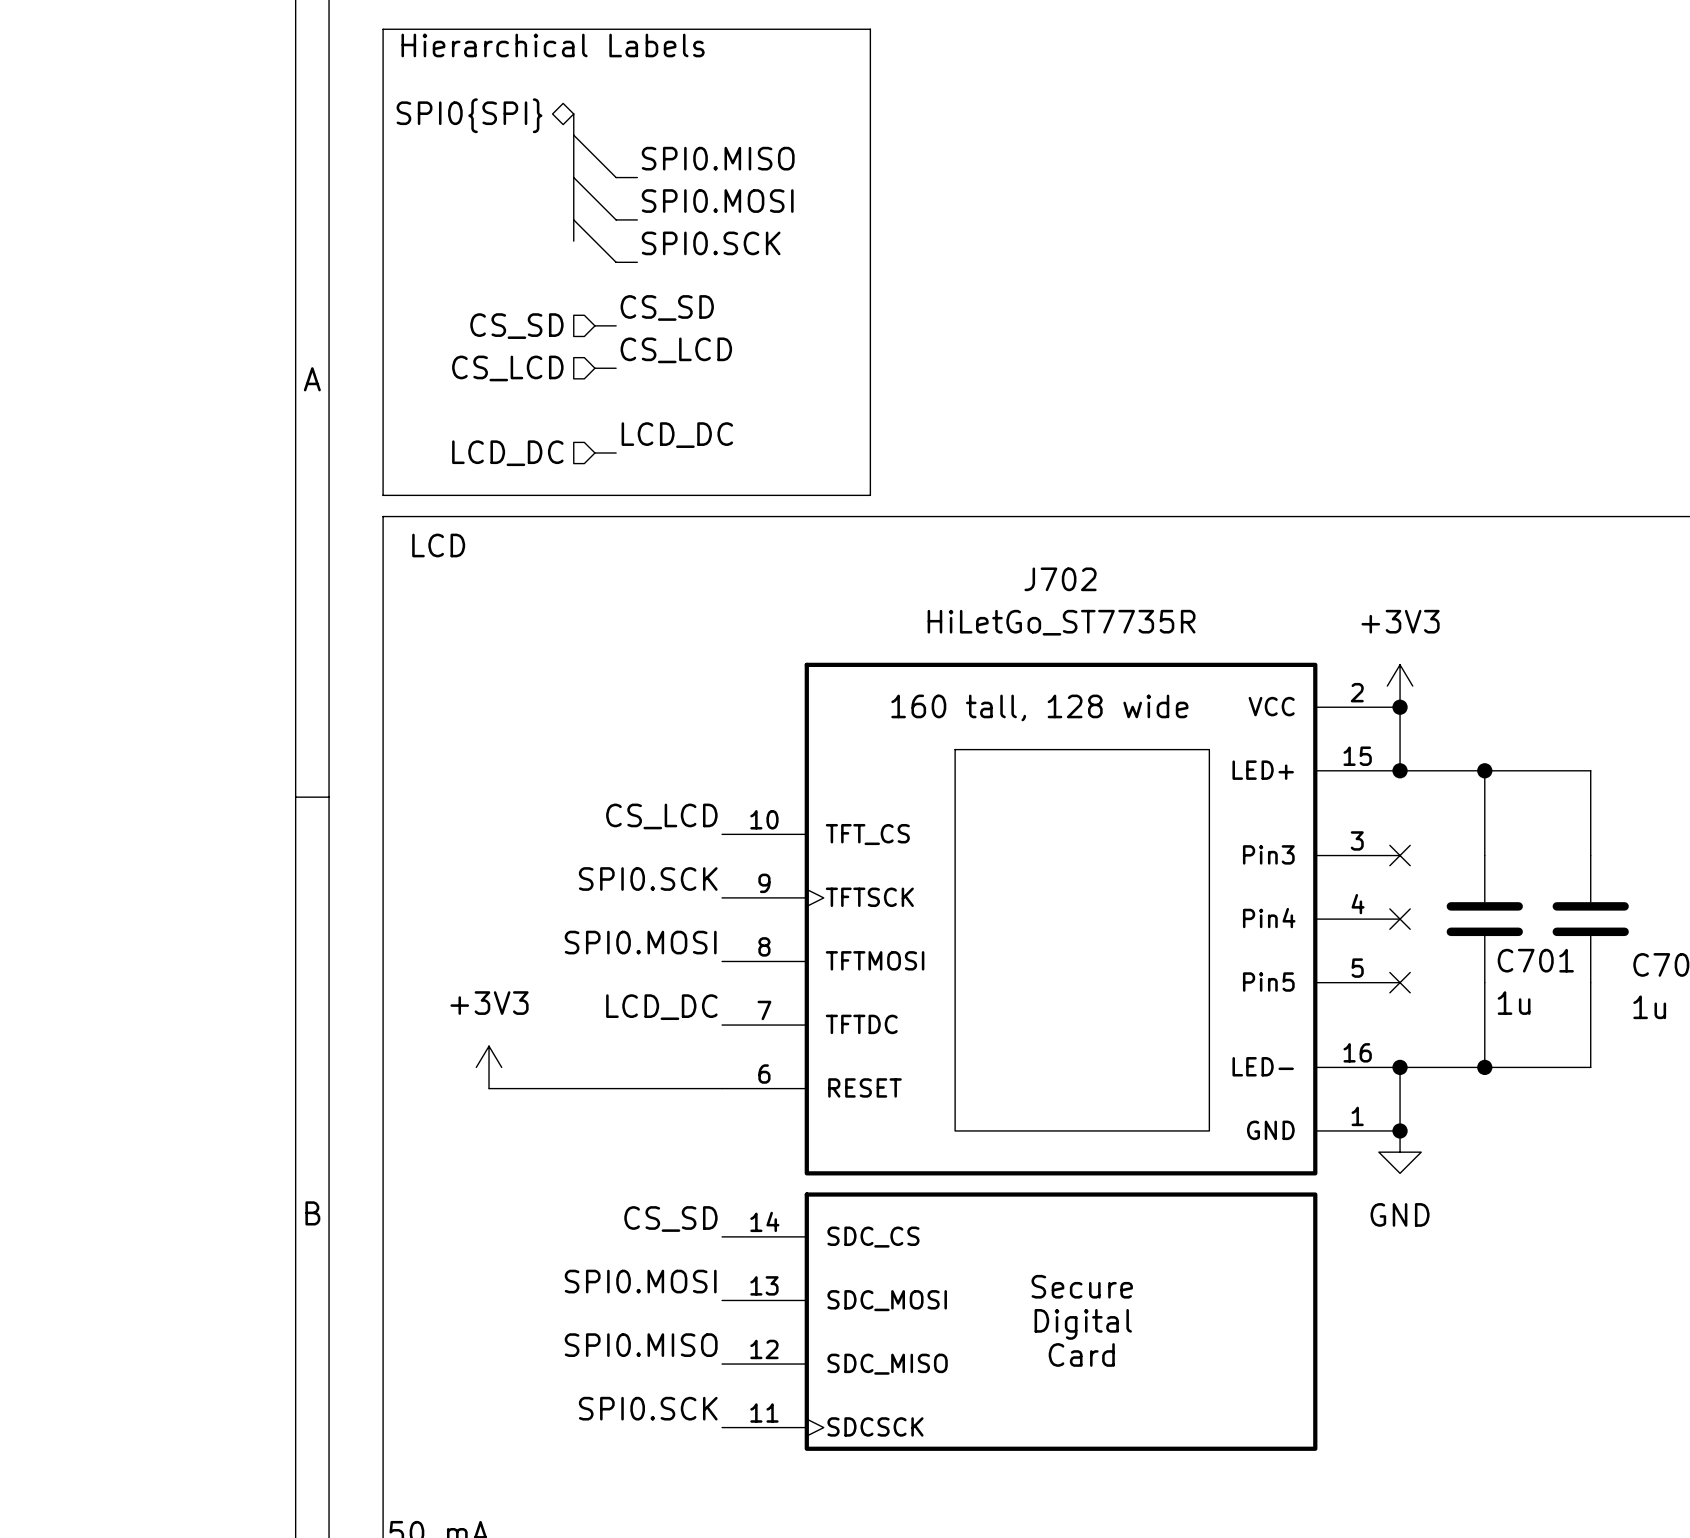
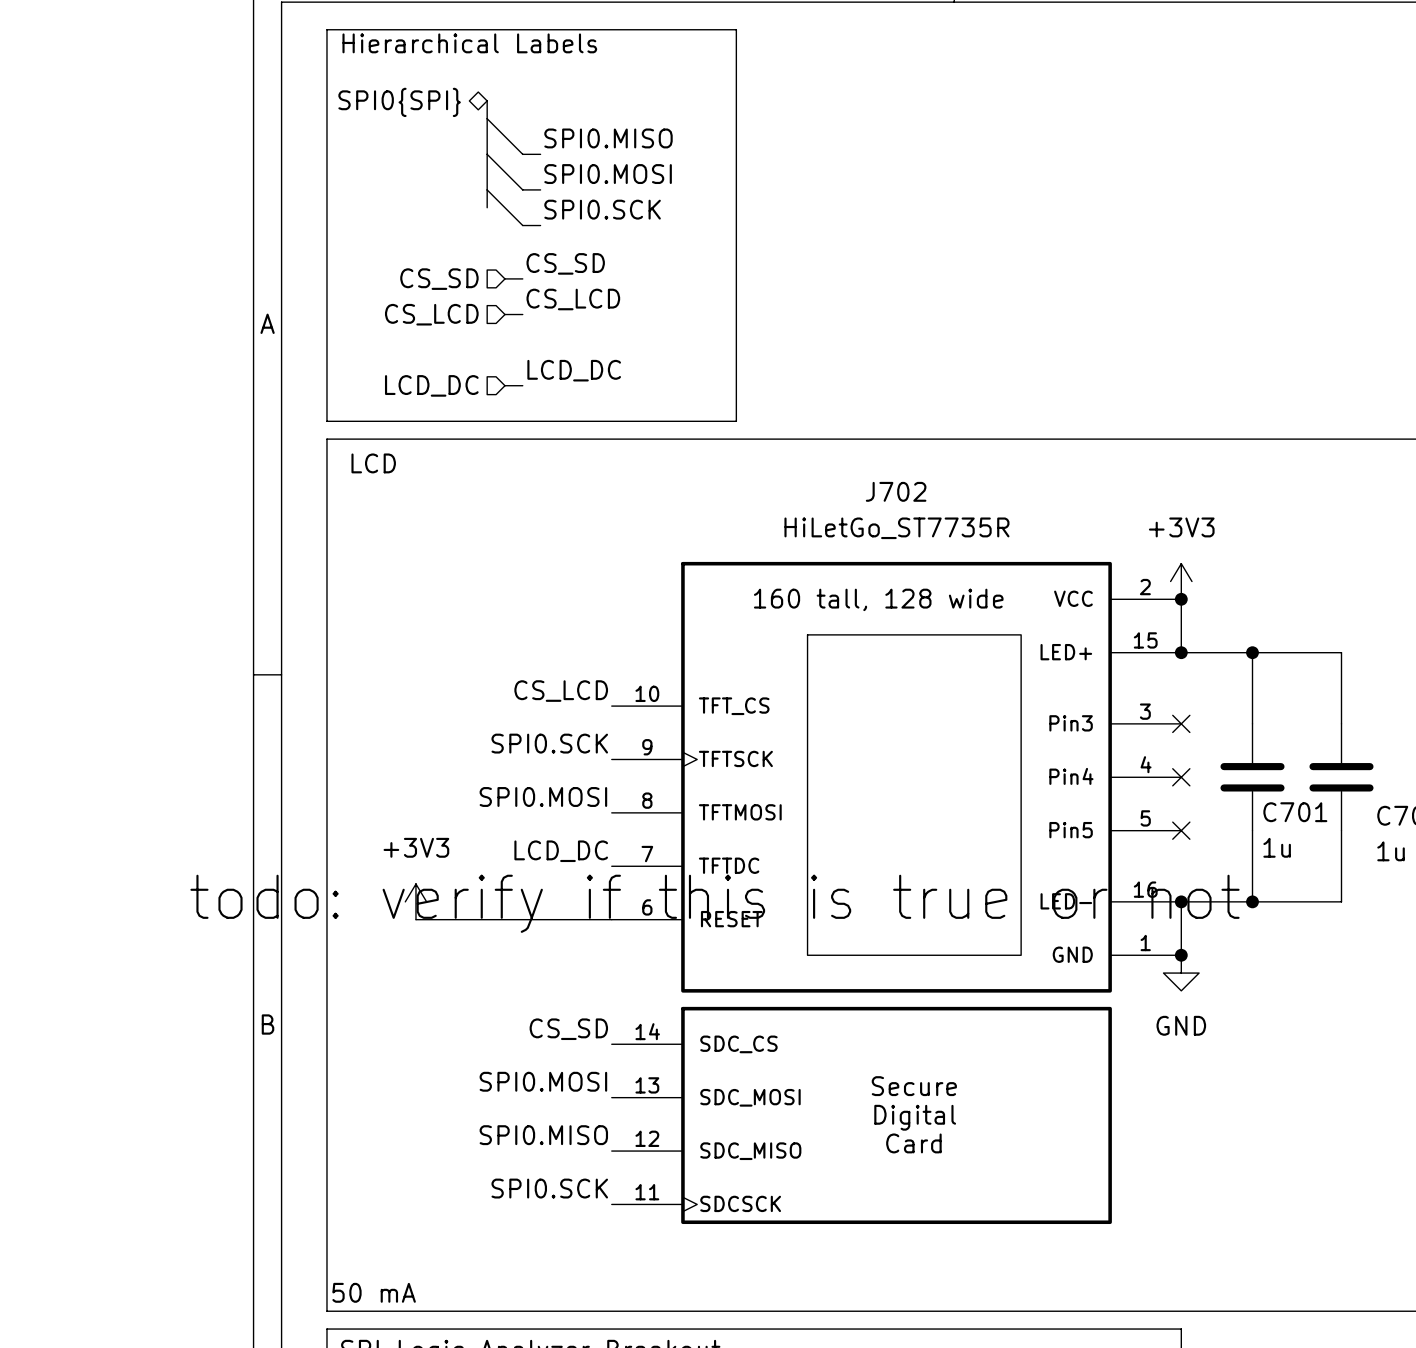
text: none -> todo: verify if this is true or not (714, 903)

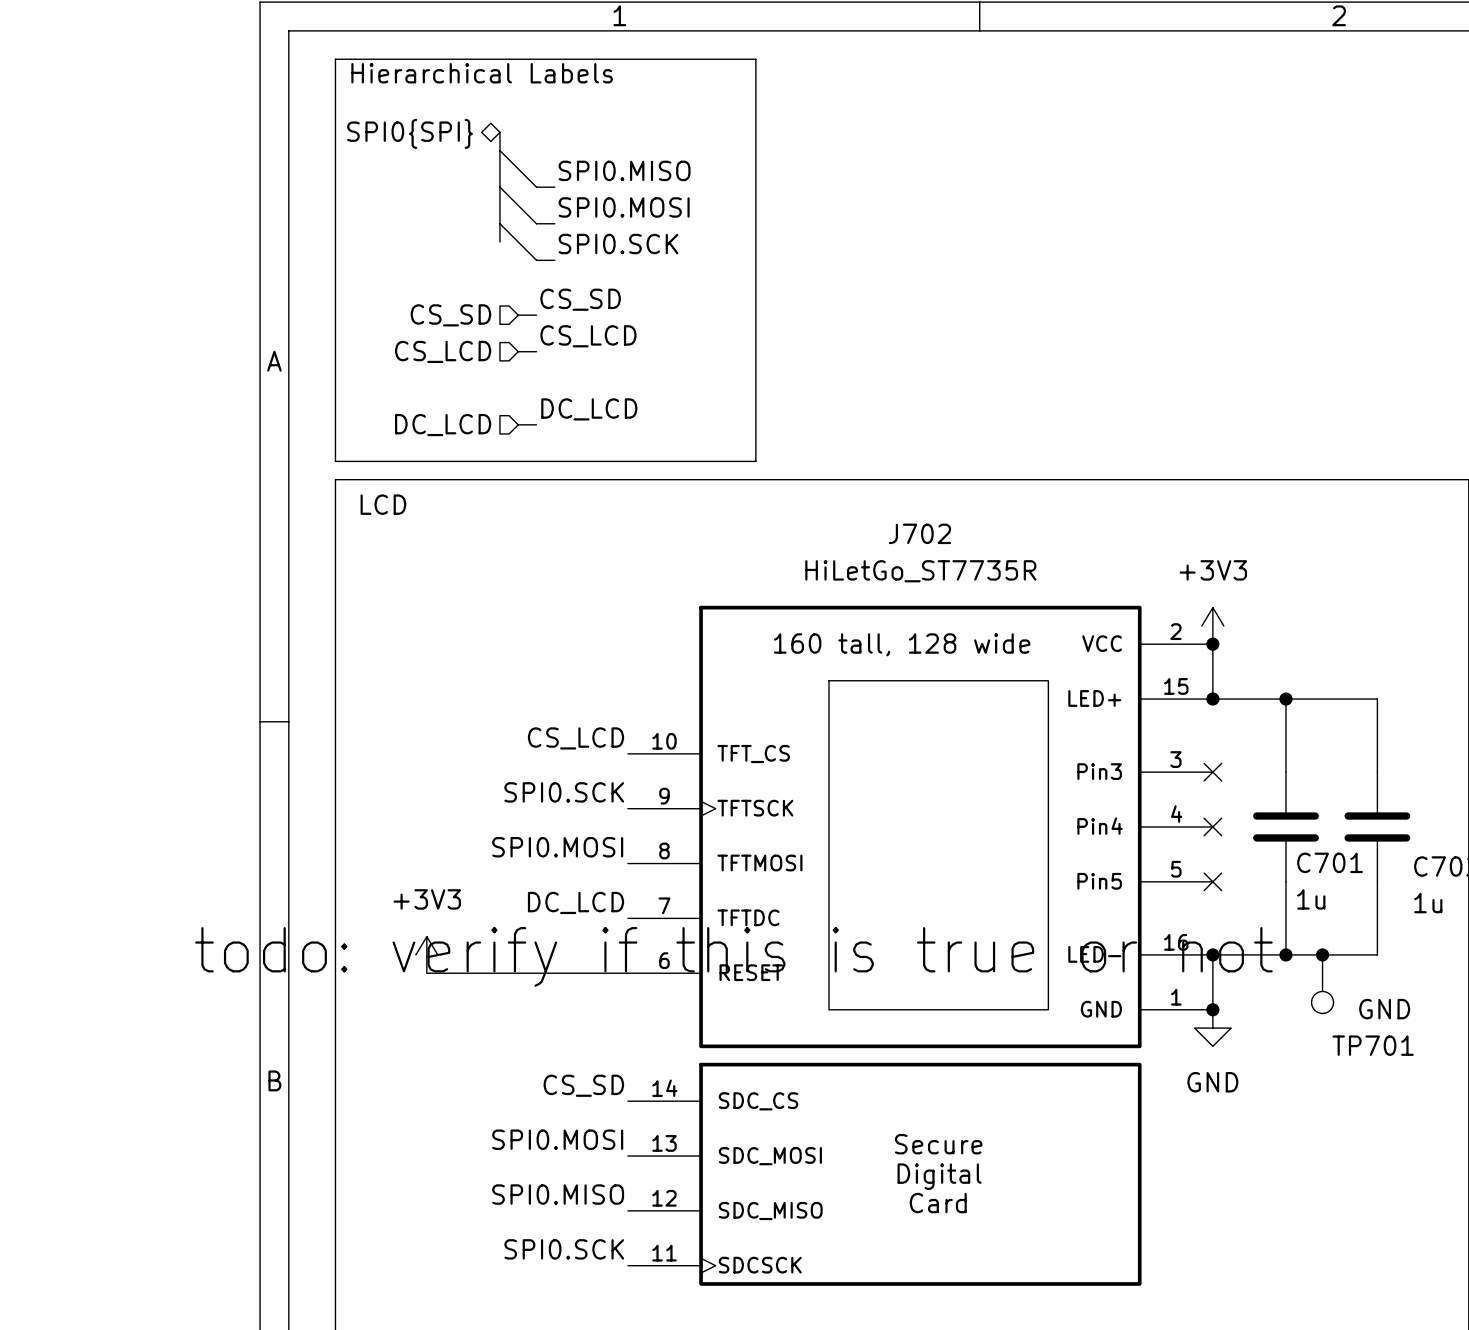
label: LCD_DC (574, 370) -> DC_LCD (589, 409)
hierarchical label: LCD_DC (431, 385) -> DC_LCD (443, 425)
label: LCD_DC (561, 851) -> DC_LCD (576, 902)
junction: none -> (1322, 954)
TP701: none -> GND (1322, 984)

